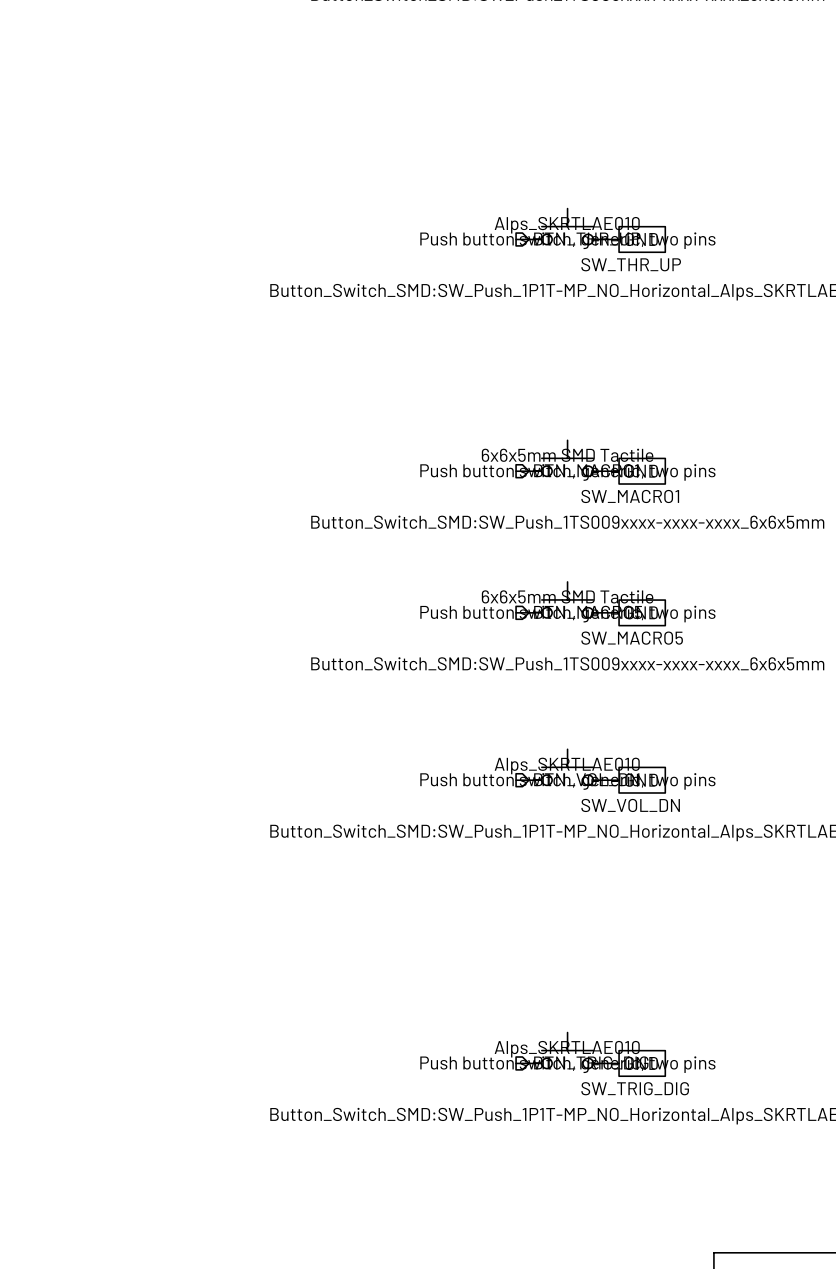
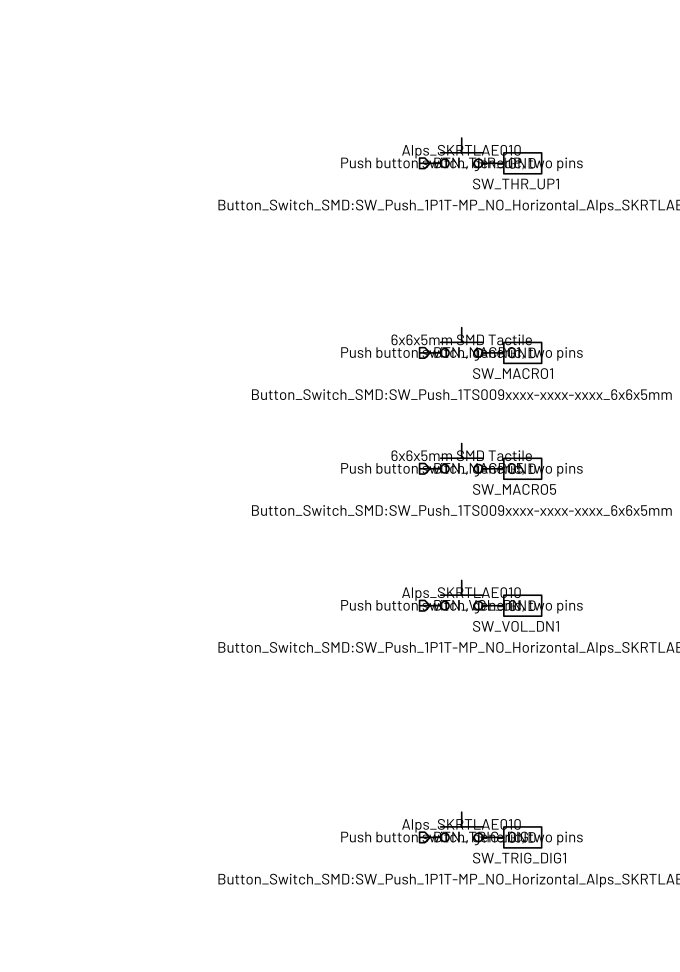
SW_THR_UP name: SW_THR_UP (631, 264) -> SW_THR_UP1 (515, 183)
SW_VOL_DN name: SW_VOL_DN (630, 805) -> SW_VOL_DN1 (515, 626)
SW_TRIG_DIG name: SW_TRIG_DIG (635, 1088) -> SW_TRIG_DIG1 (519, 858)

